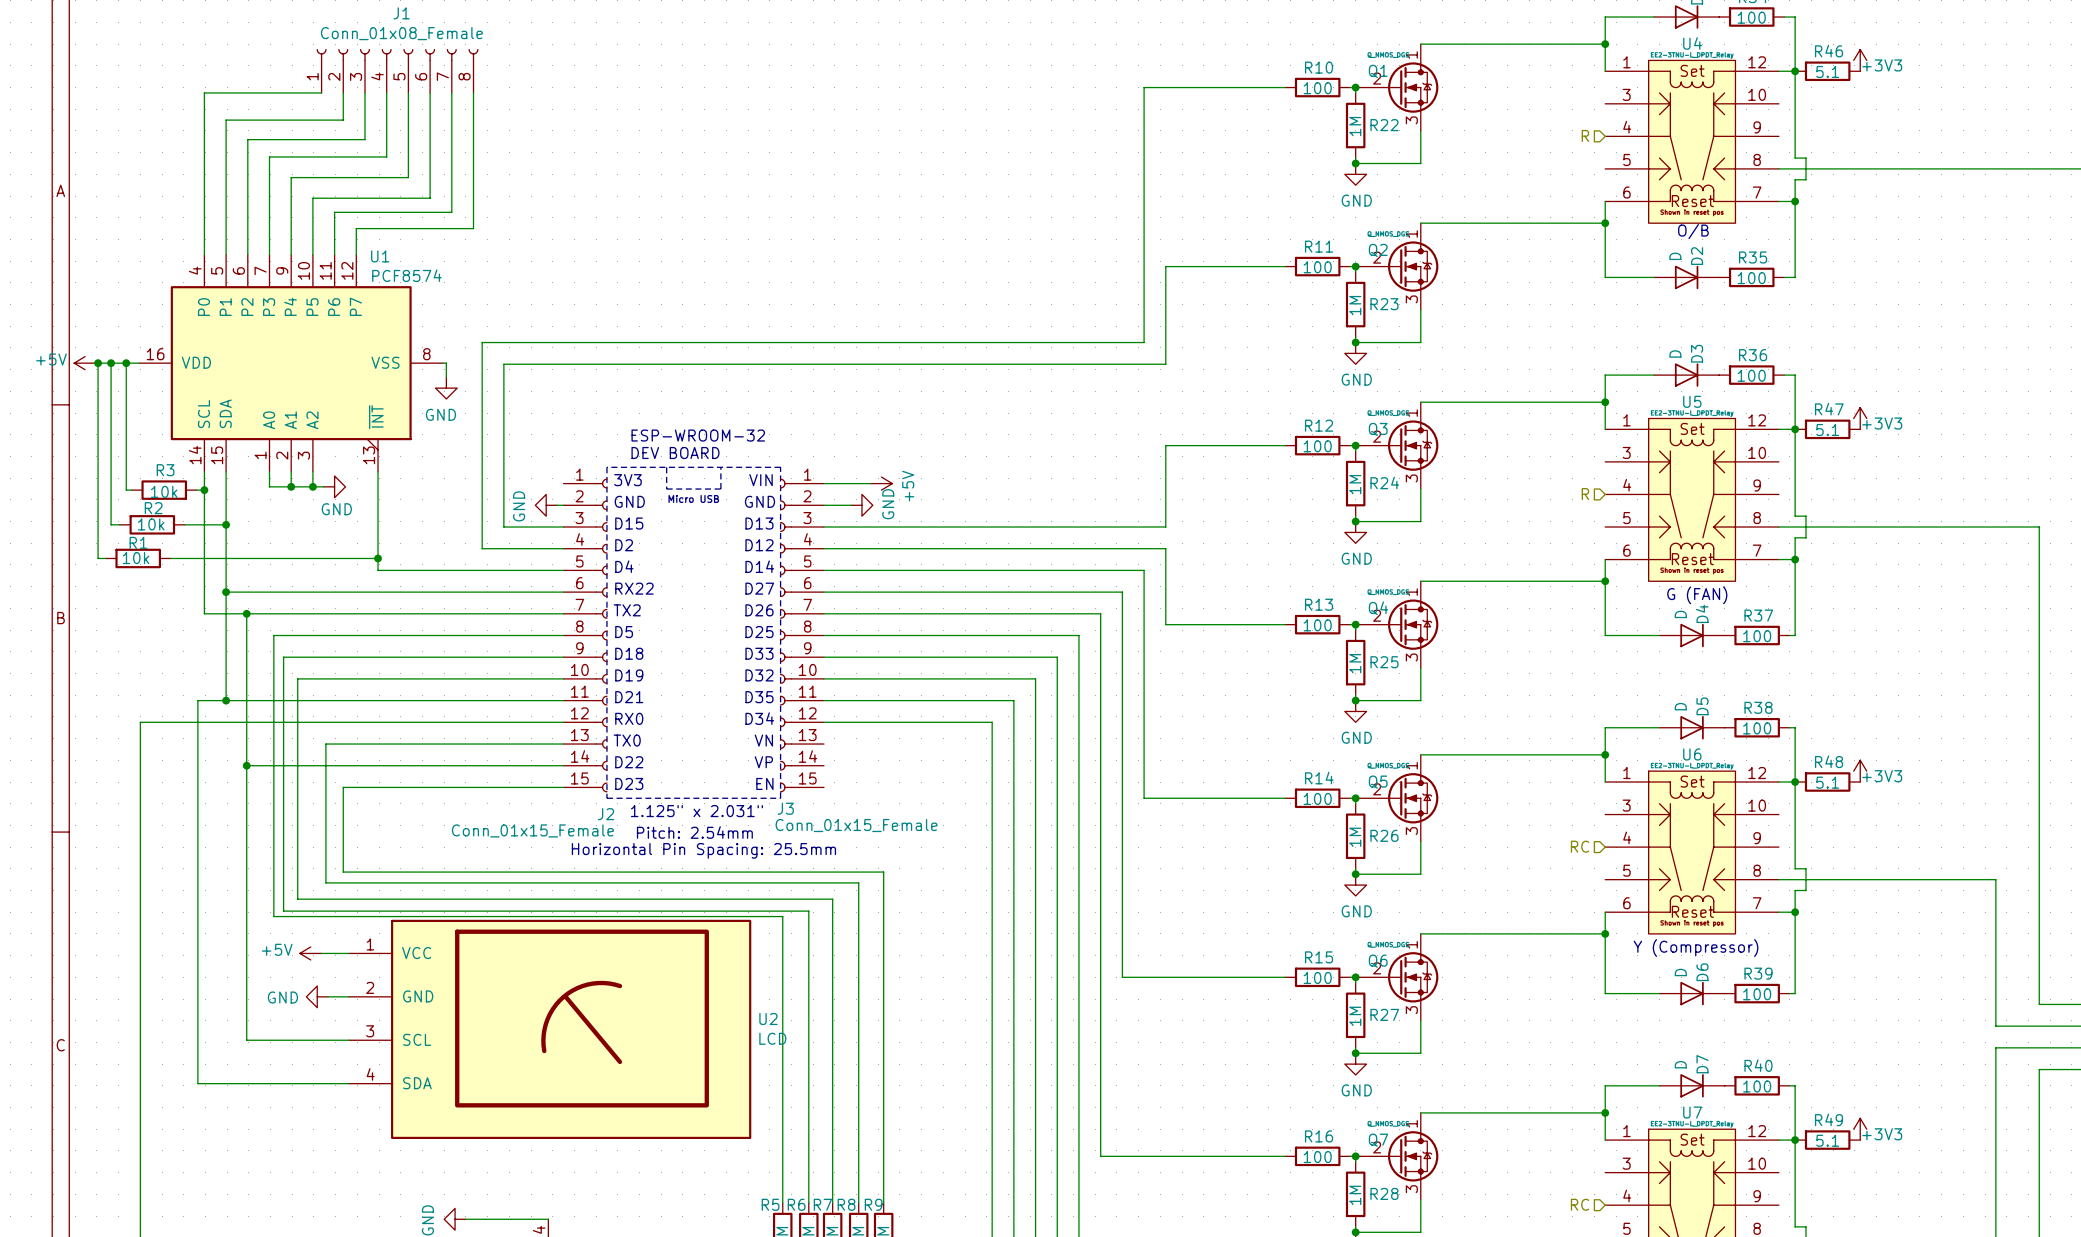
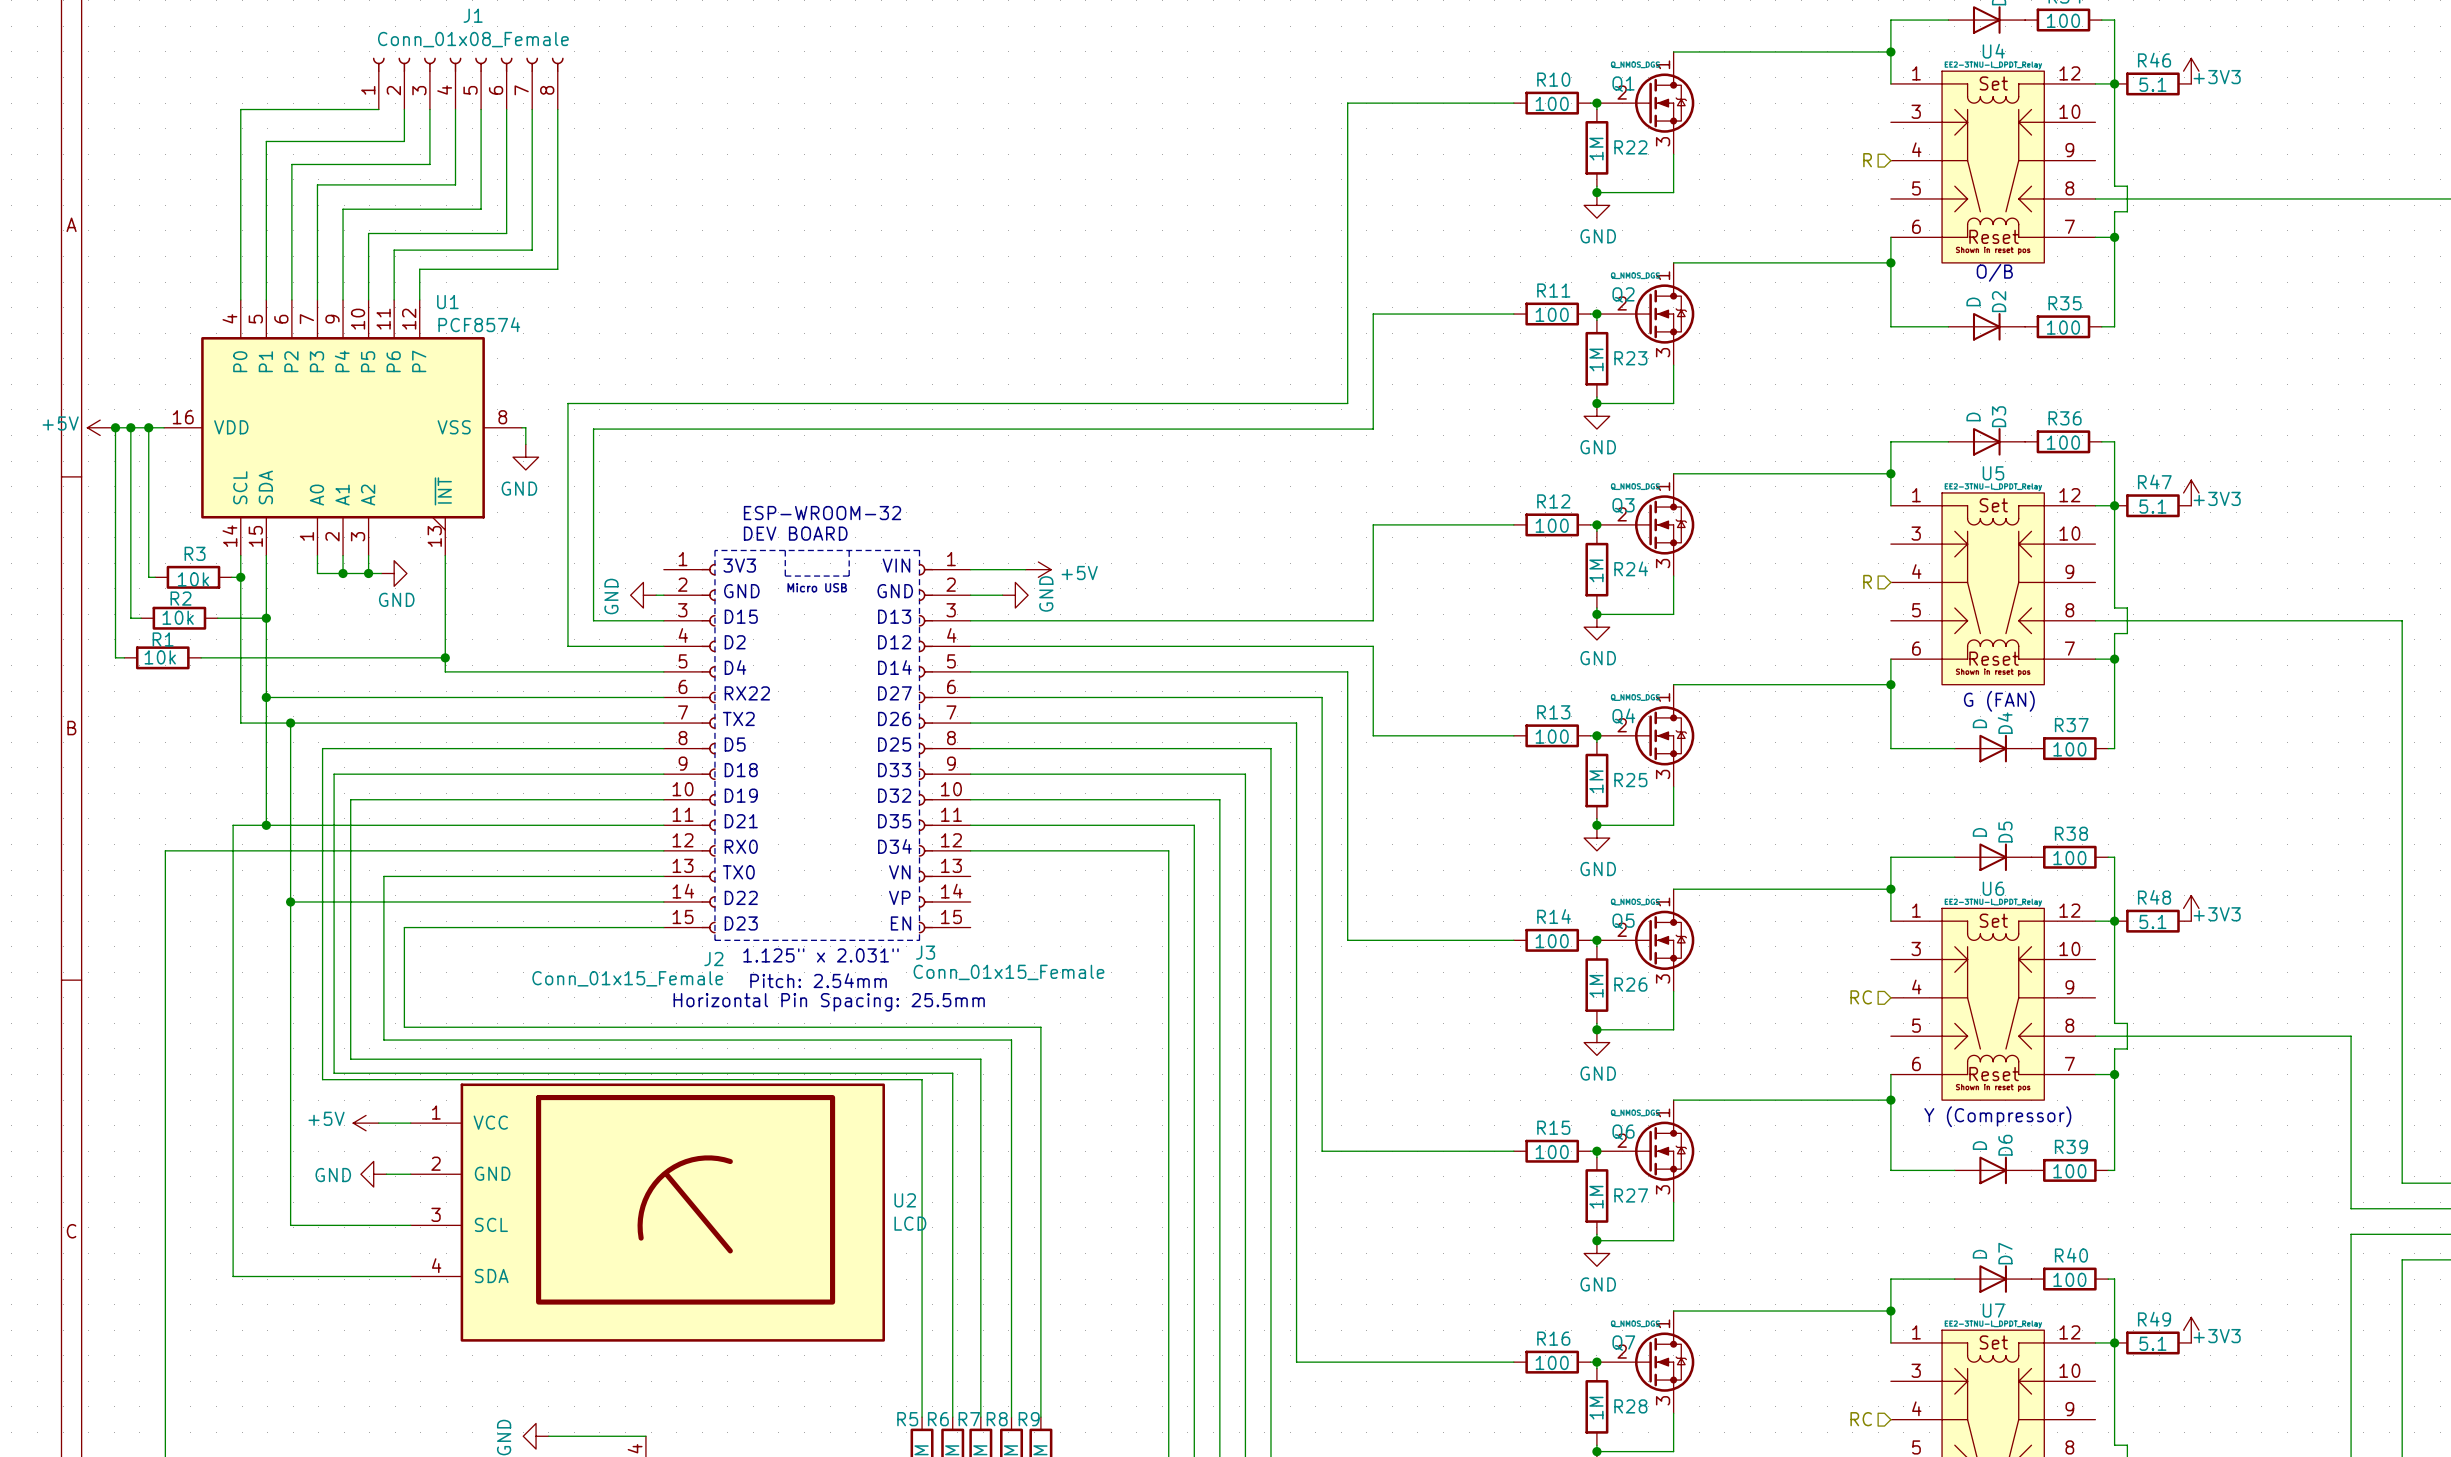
power symbol text rotation: 0° (908, 486) -> 90° clockwise (1079, 573)

